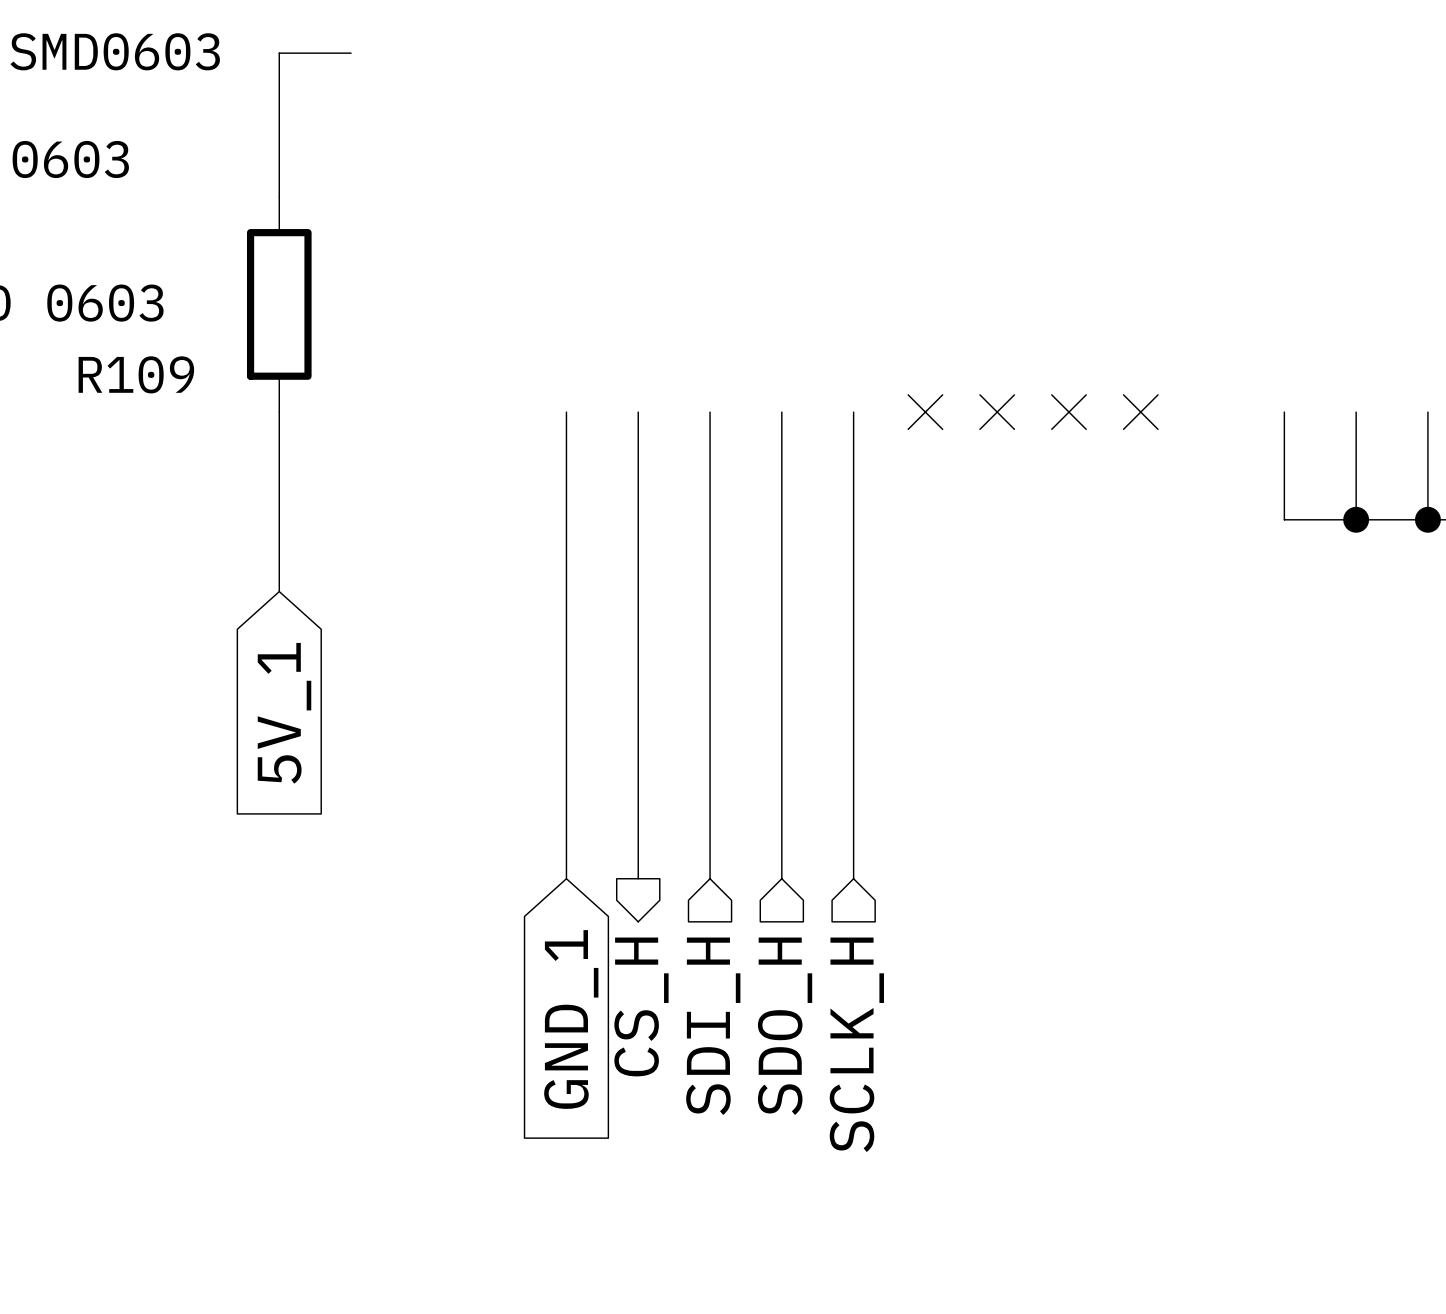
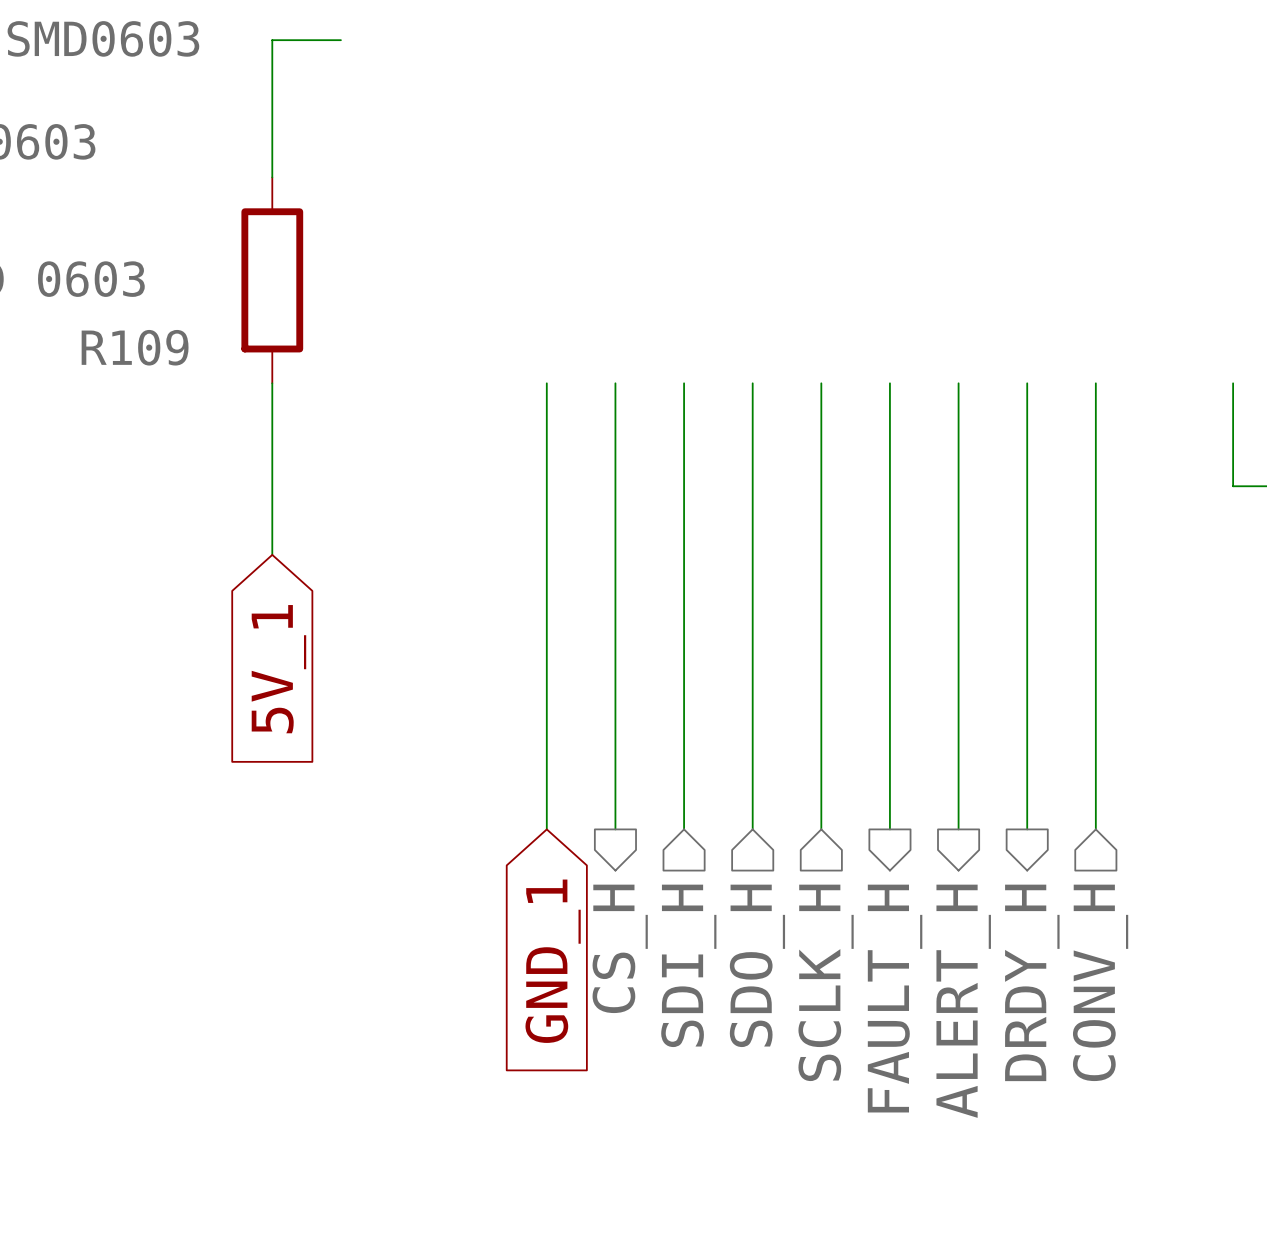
wire: none -> (889, 383) (889, 829)
no-connect mark: (925, 412) -> none
wire: none -> (958, 383) (958, 829)
no-connect mark: (997, 412) -> none
wire: none -> (1027, 383) (1027, 829)
no-connect mark: (1068, 412) -> none
wire: none -> (1095, 383) (1095, 829)
no-connect mark: (1140, 412) -> none
hierarchical label: none -> DRDY_H (1032, 982)
hierarchical label: none -> CONV_H (1100, 982)
hierarchical label: none -> FAULT_H (895, 998)
hierarchical label: none -> ALERT_H (963, 1001)

